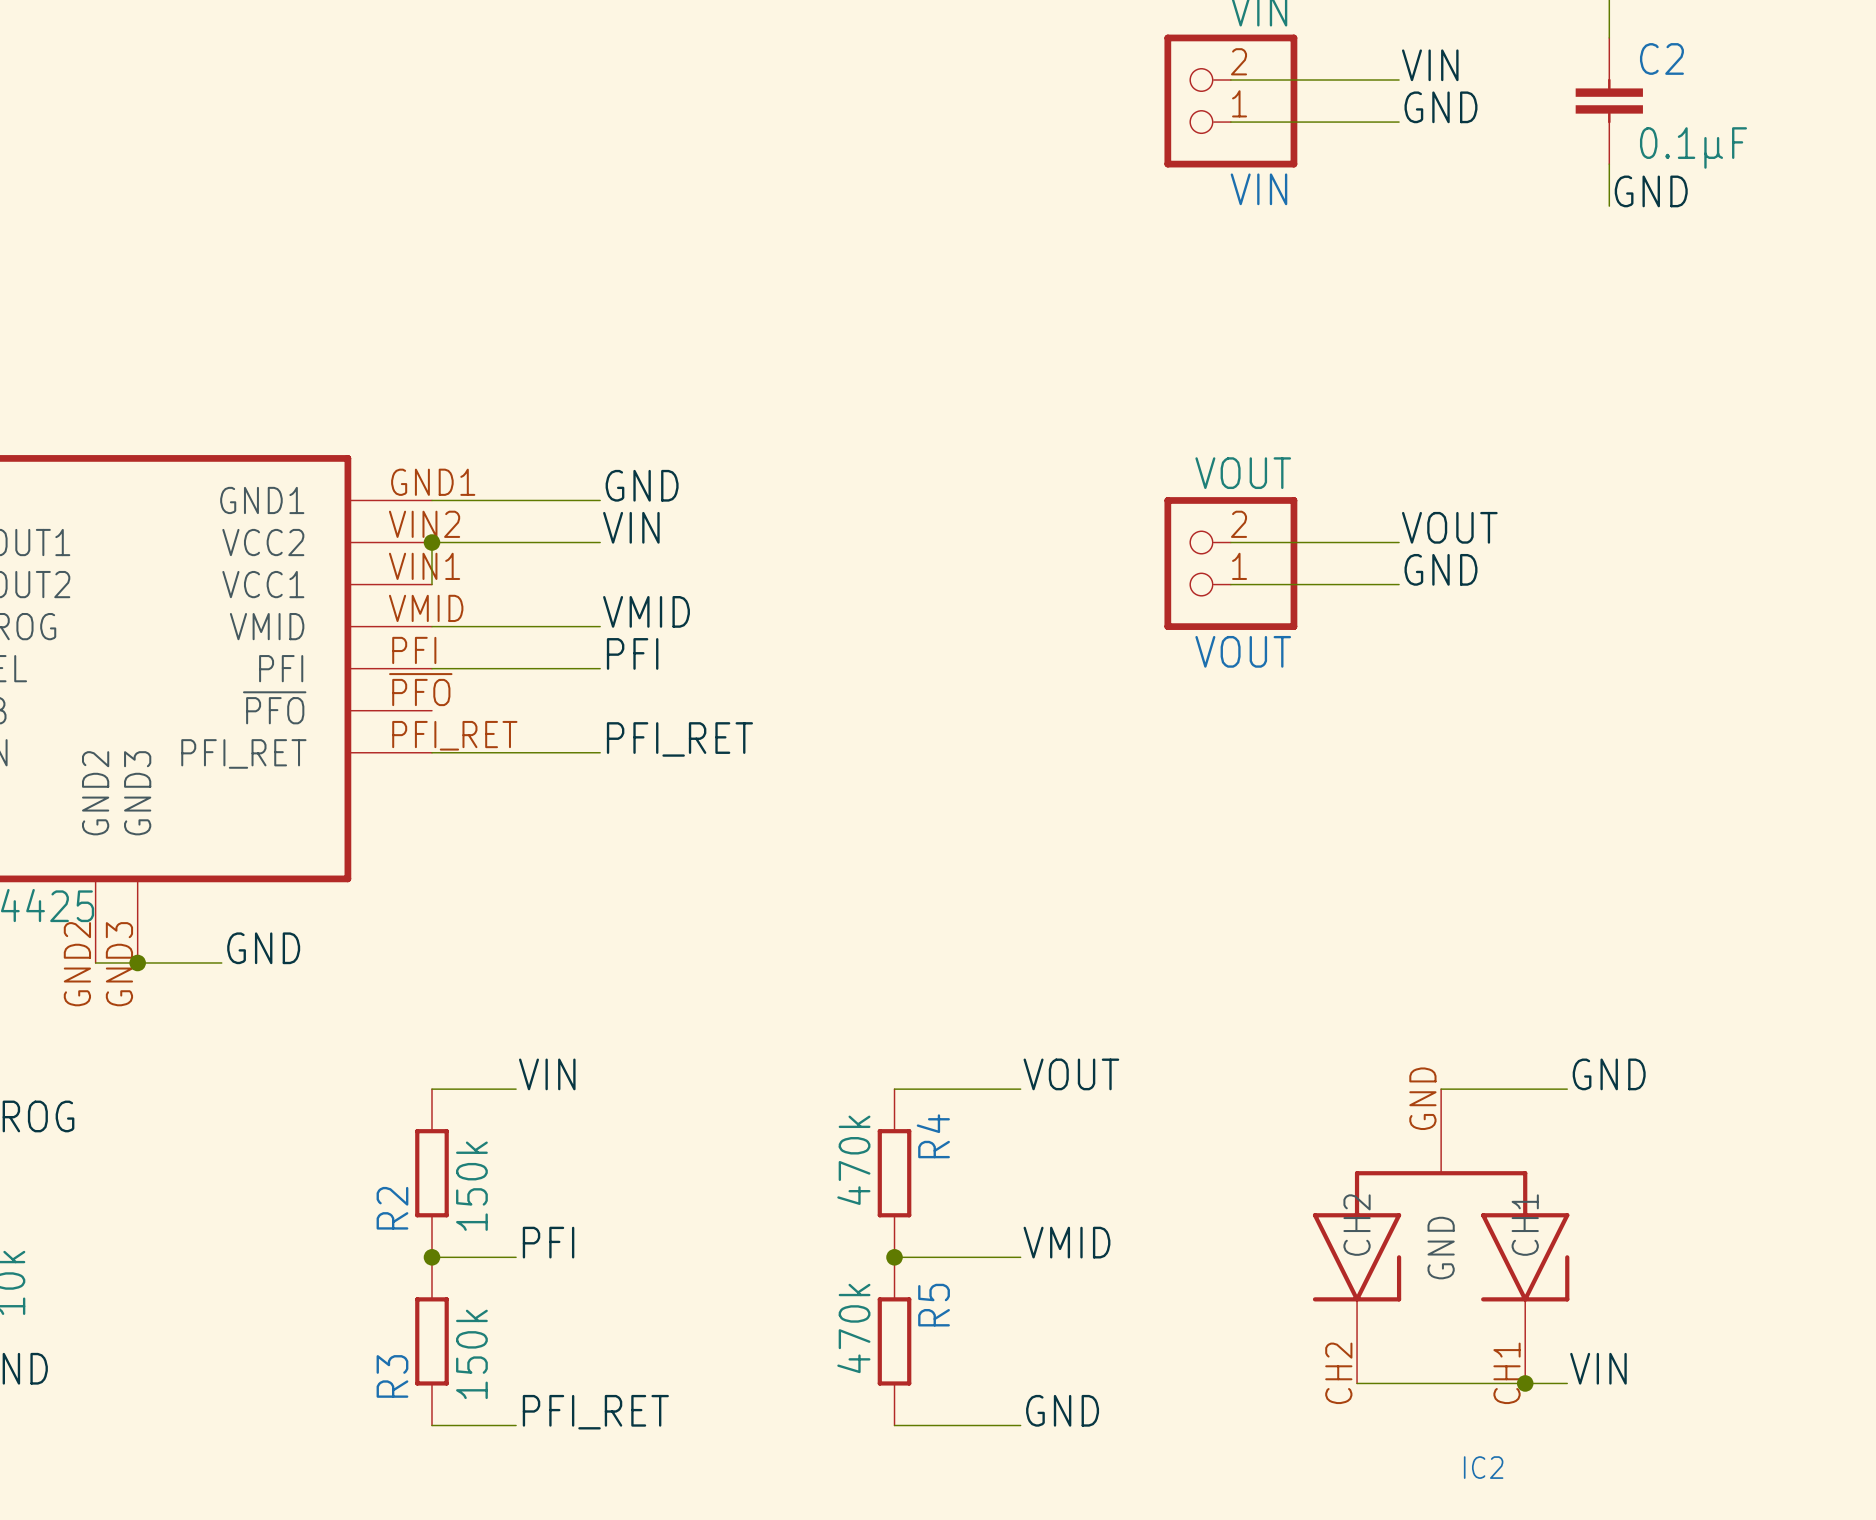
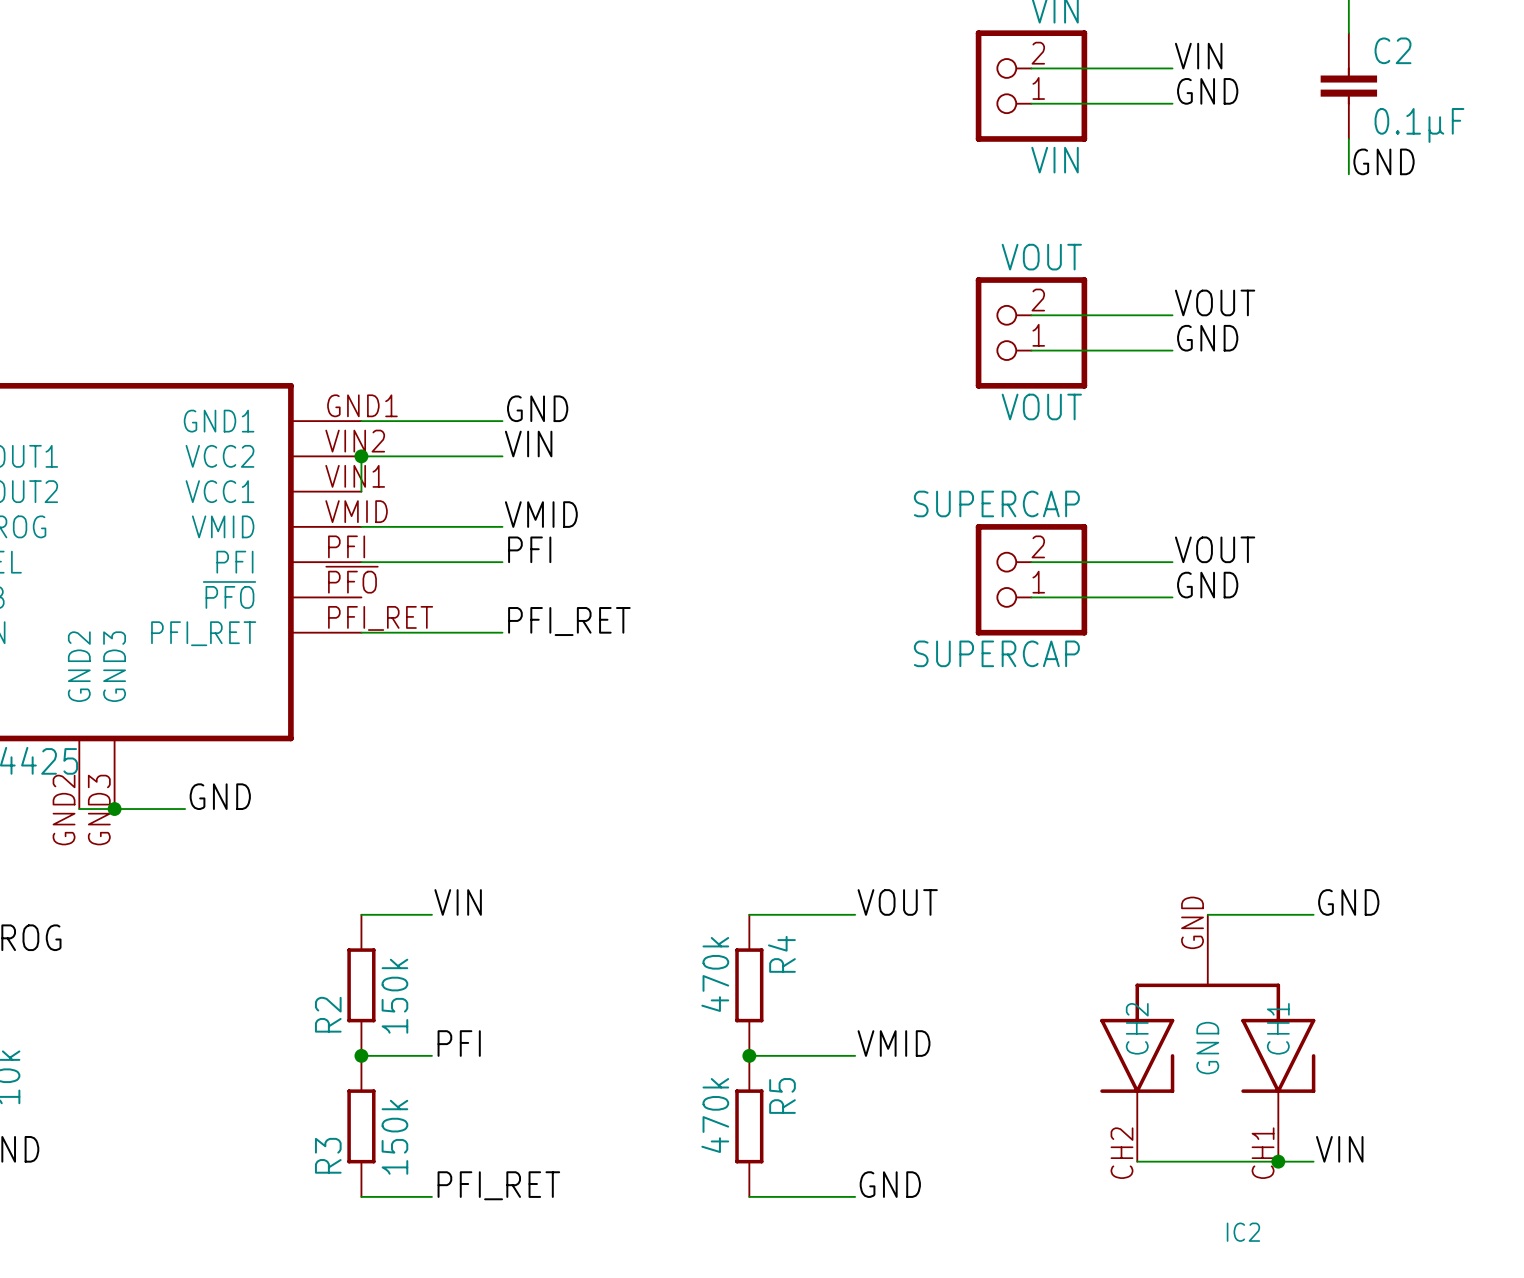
label: none -> VOUT (1215, 302)
wire: none -> (1031, 315) (1172, 315)
label: none -> GND (1207, 338)
label: VOUT (1449, 527) -> none
wire: (1230, 542) (1399, 542) -> (1031, 350) (1172, 350)
VOUT position: (1230, 563) -> (1031, 332)
label: GND (1440, 569) -> none
wire: (1230, 584) (1399, 584) -> (1031, 562) (1172, 562)
label: none -> VOUT (1215, 549)
SUPERCAP: none -> SUPERCAP (1031, 579)
label: none -> GND (1207, 585)
wire: none -> (1031, 597) (1172, 597)

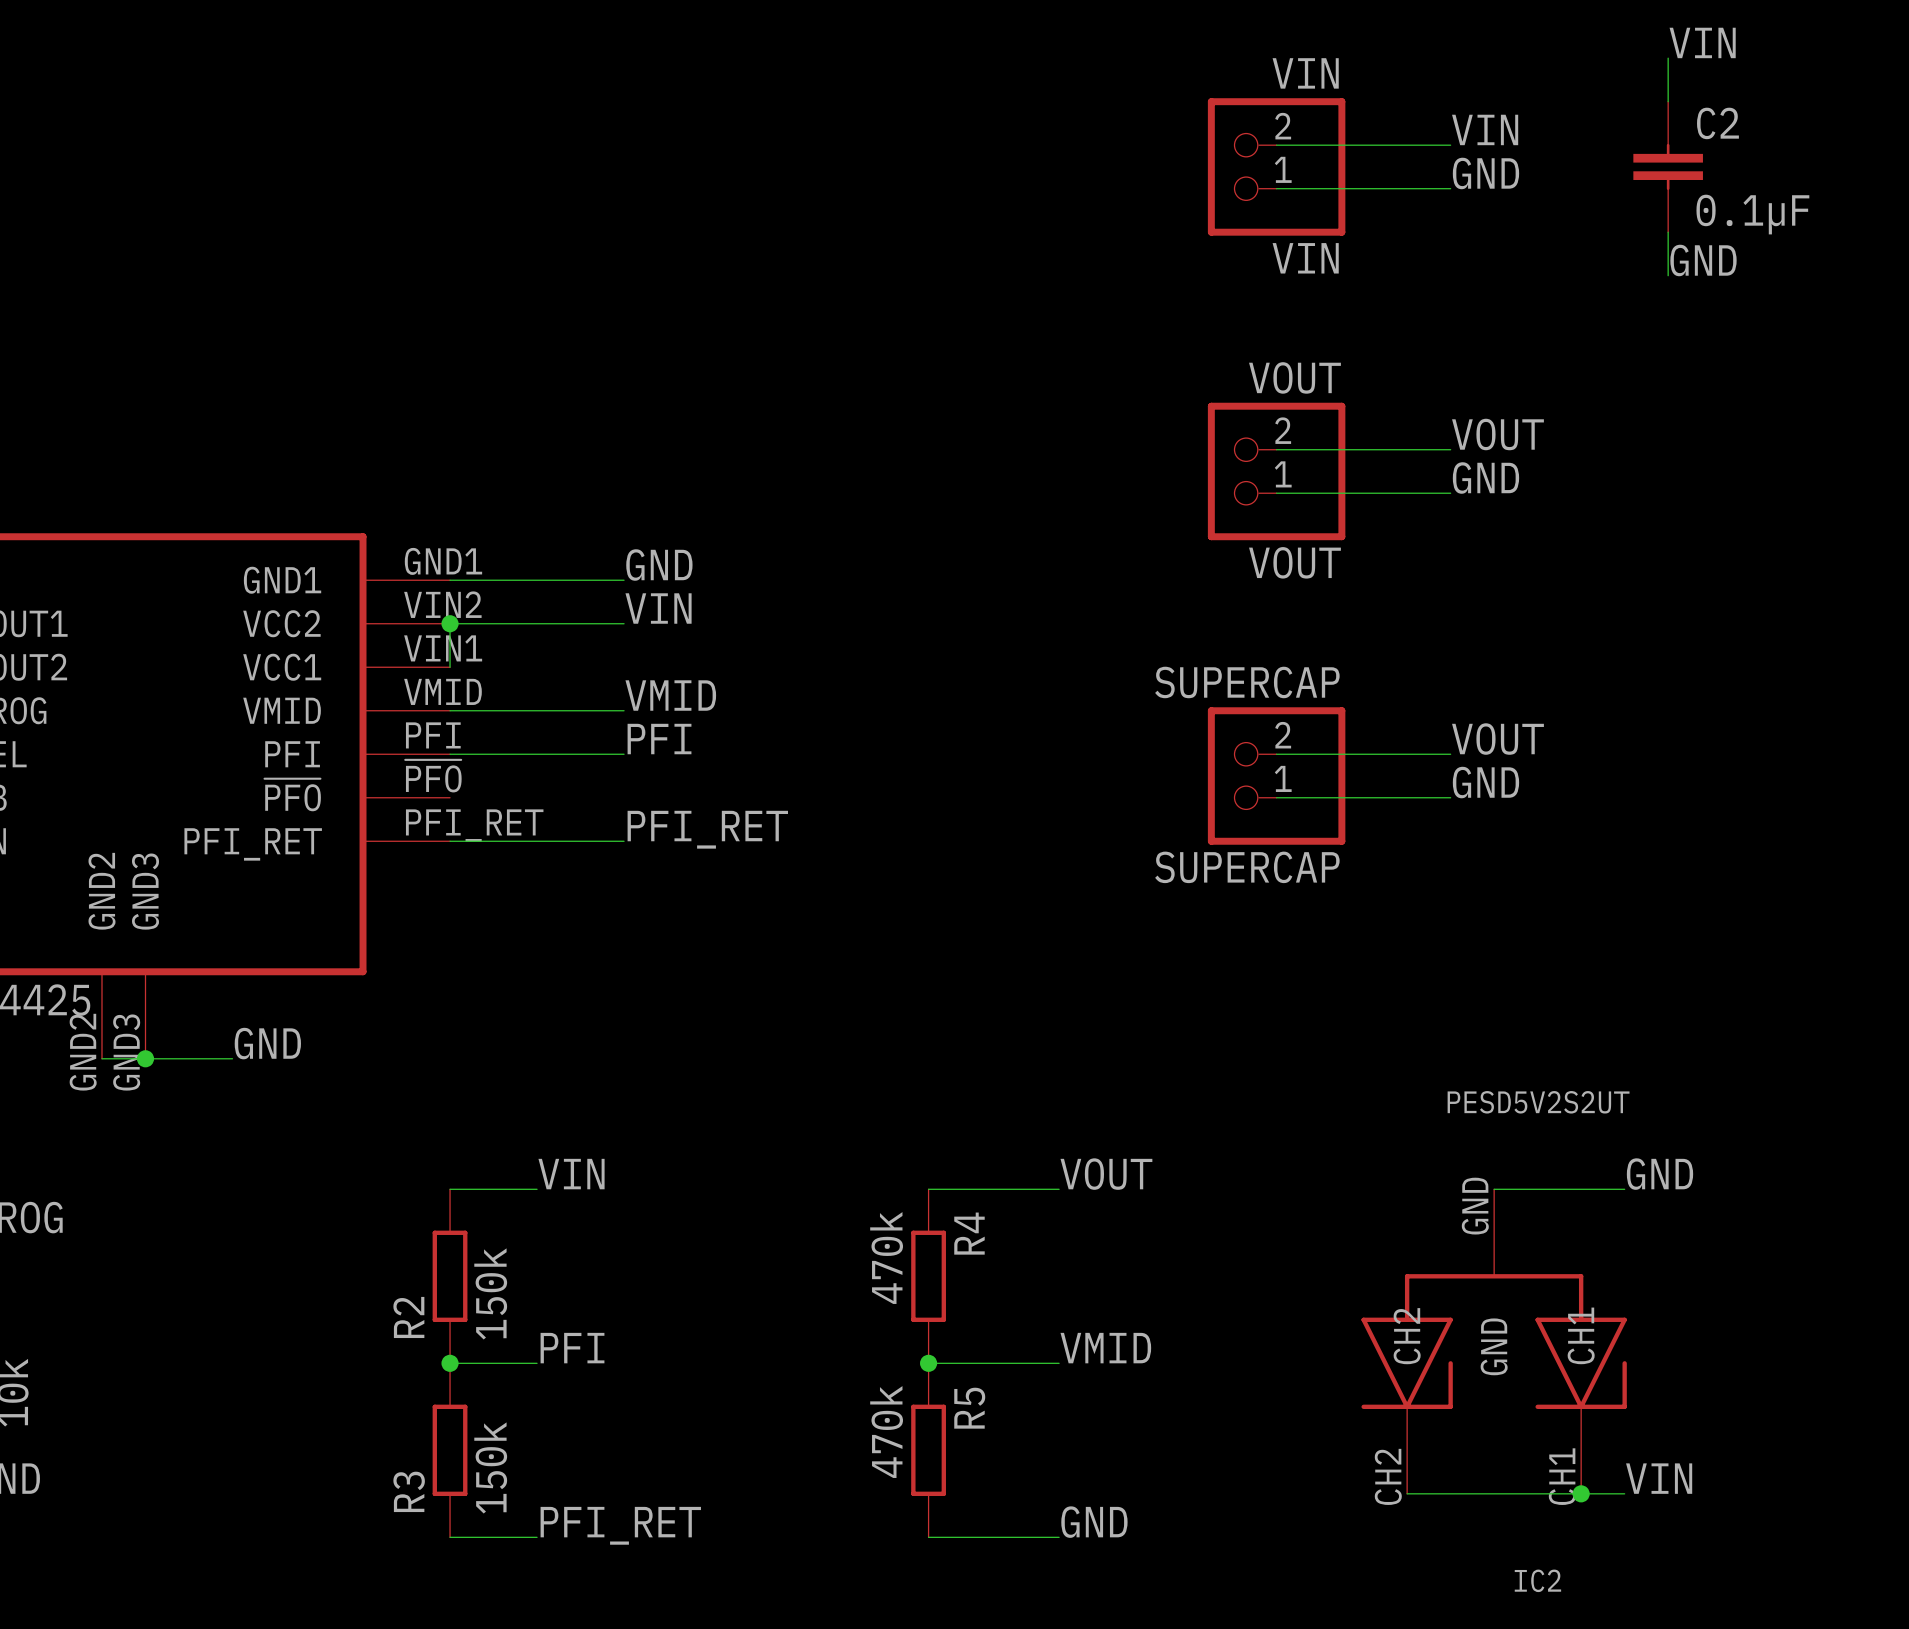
IC2 value: none -> PESD5V2S2UT (1538, 1102)

